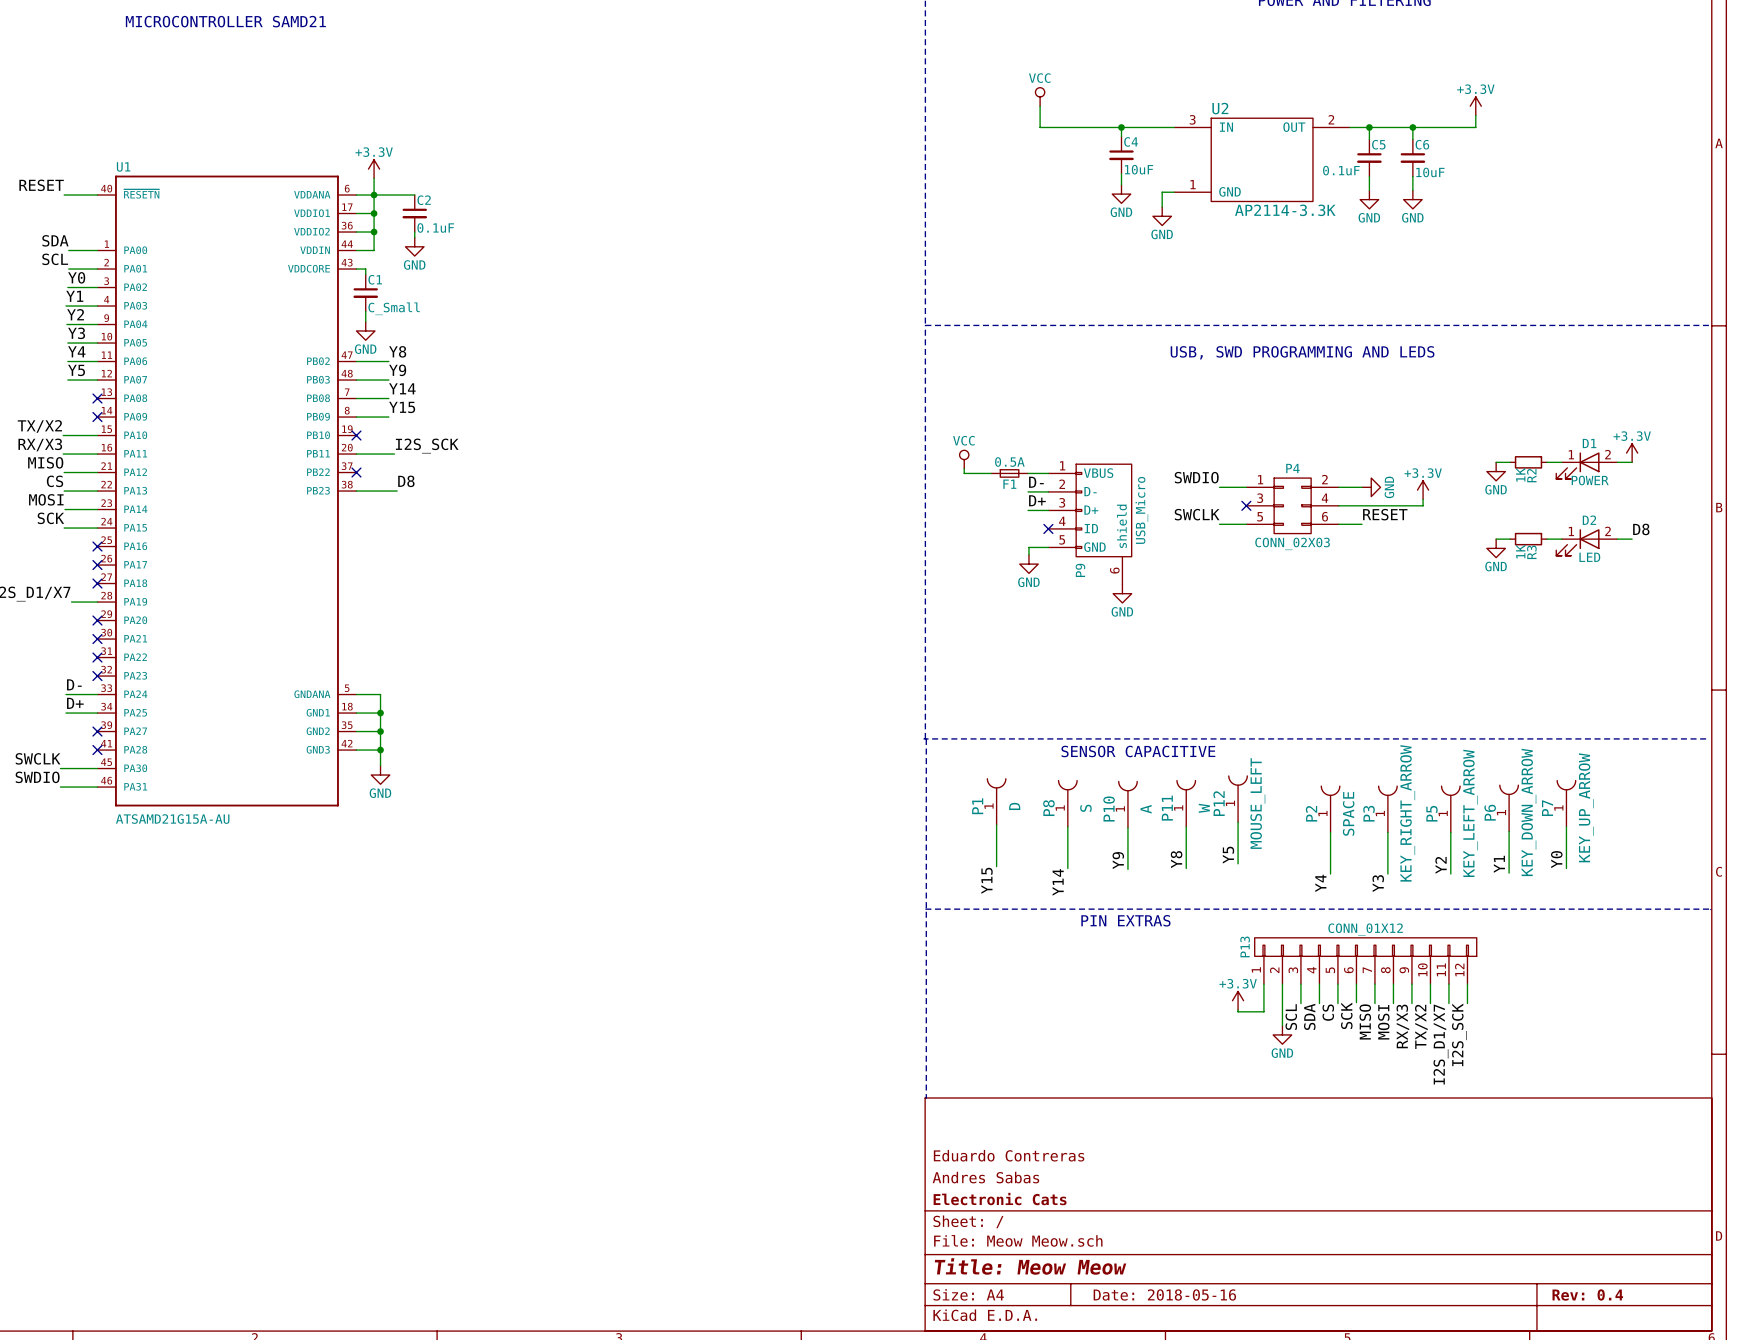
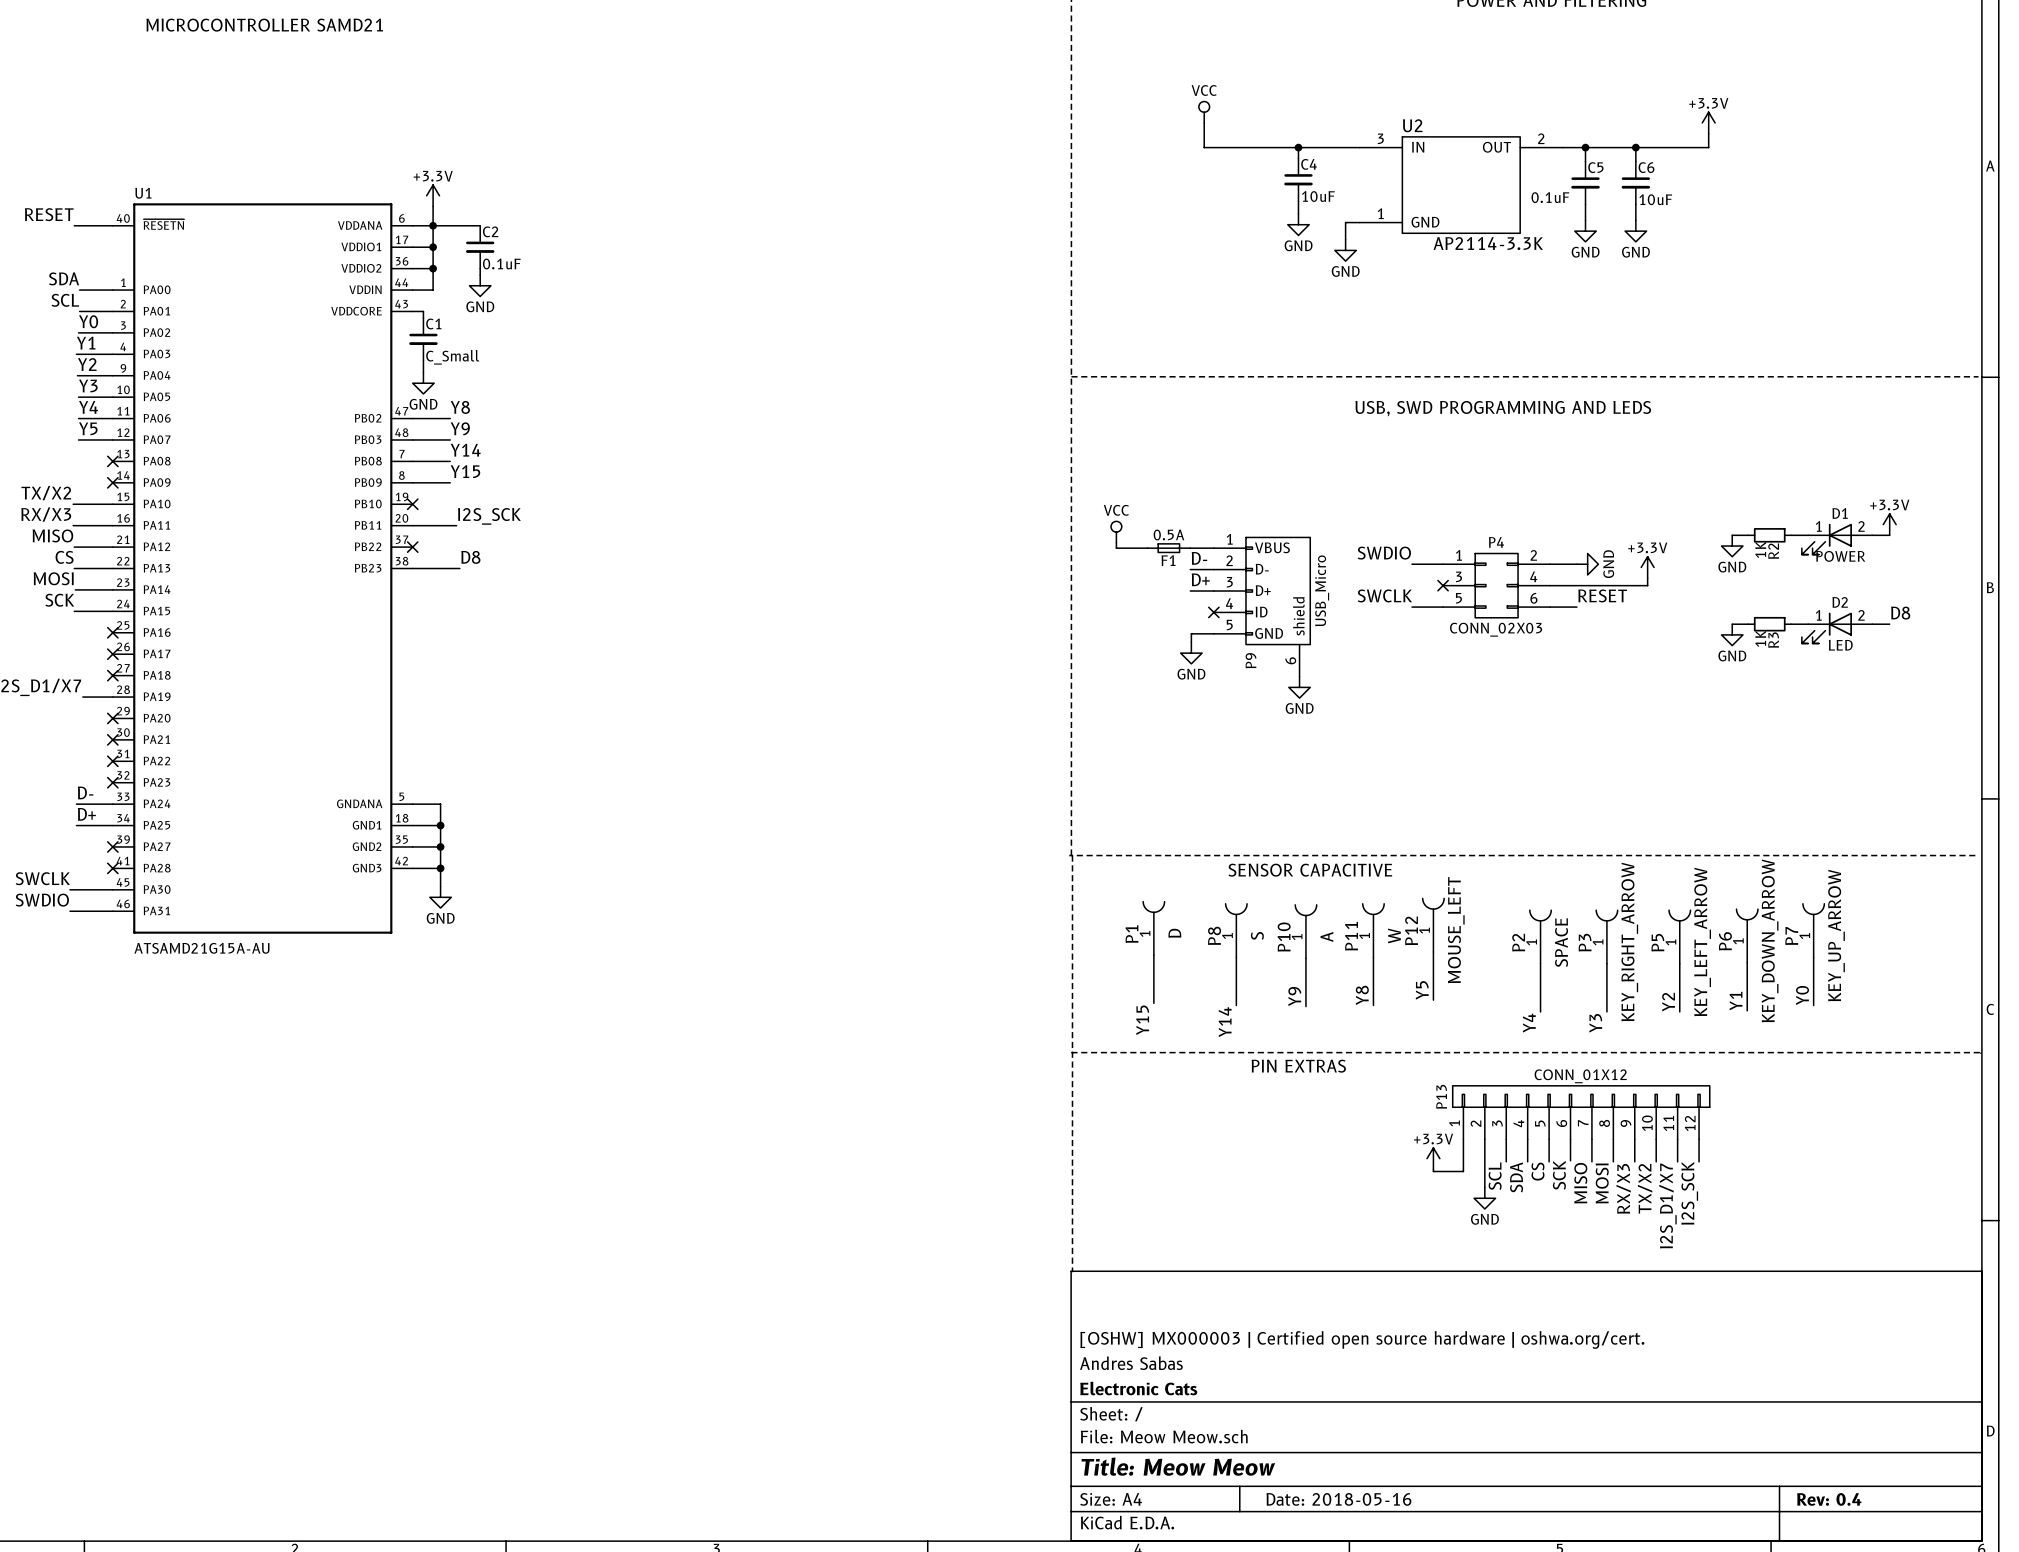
title block: Eduardo Contreras (1009, 1155) -> [OSHW] MX000003 | Certified open source hardware | oshwa.org/cert. (1362, 1339)

